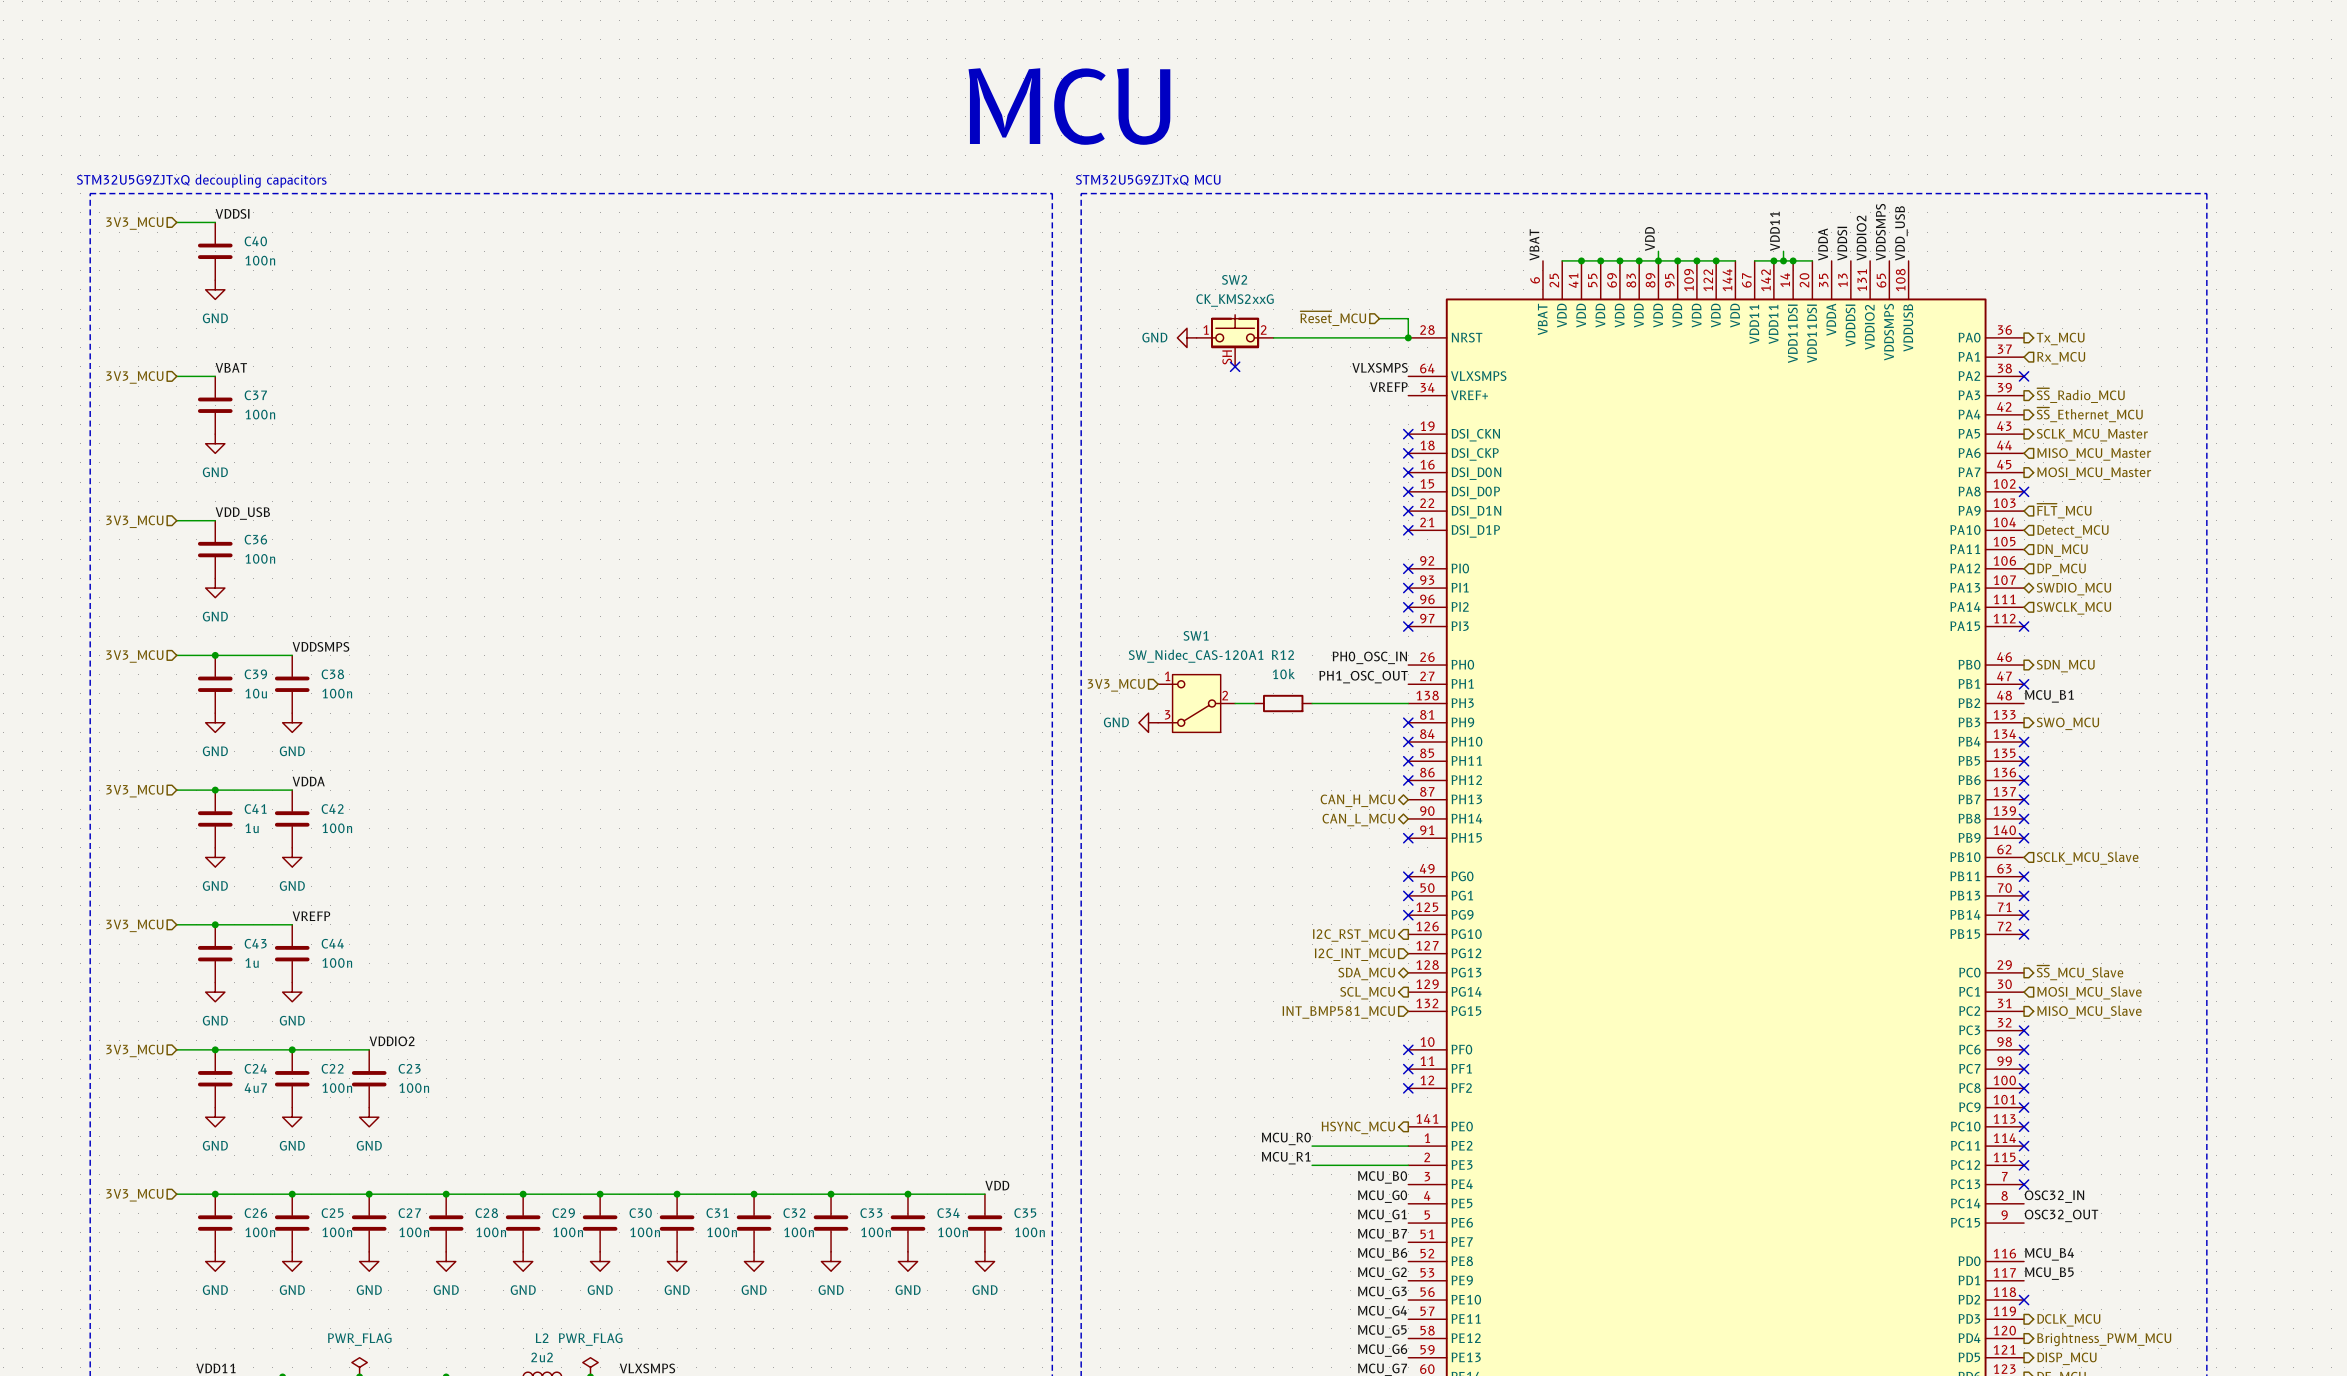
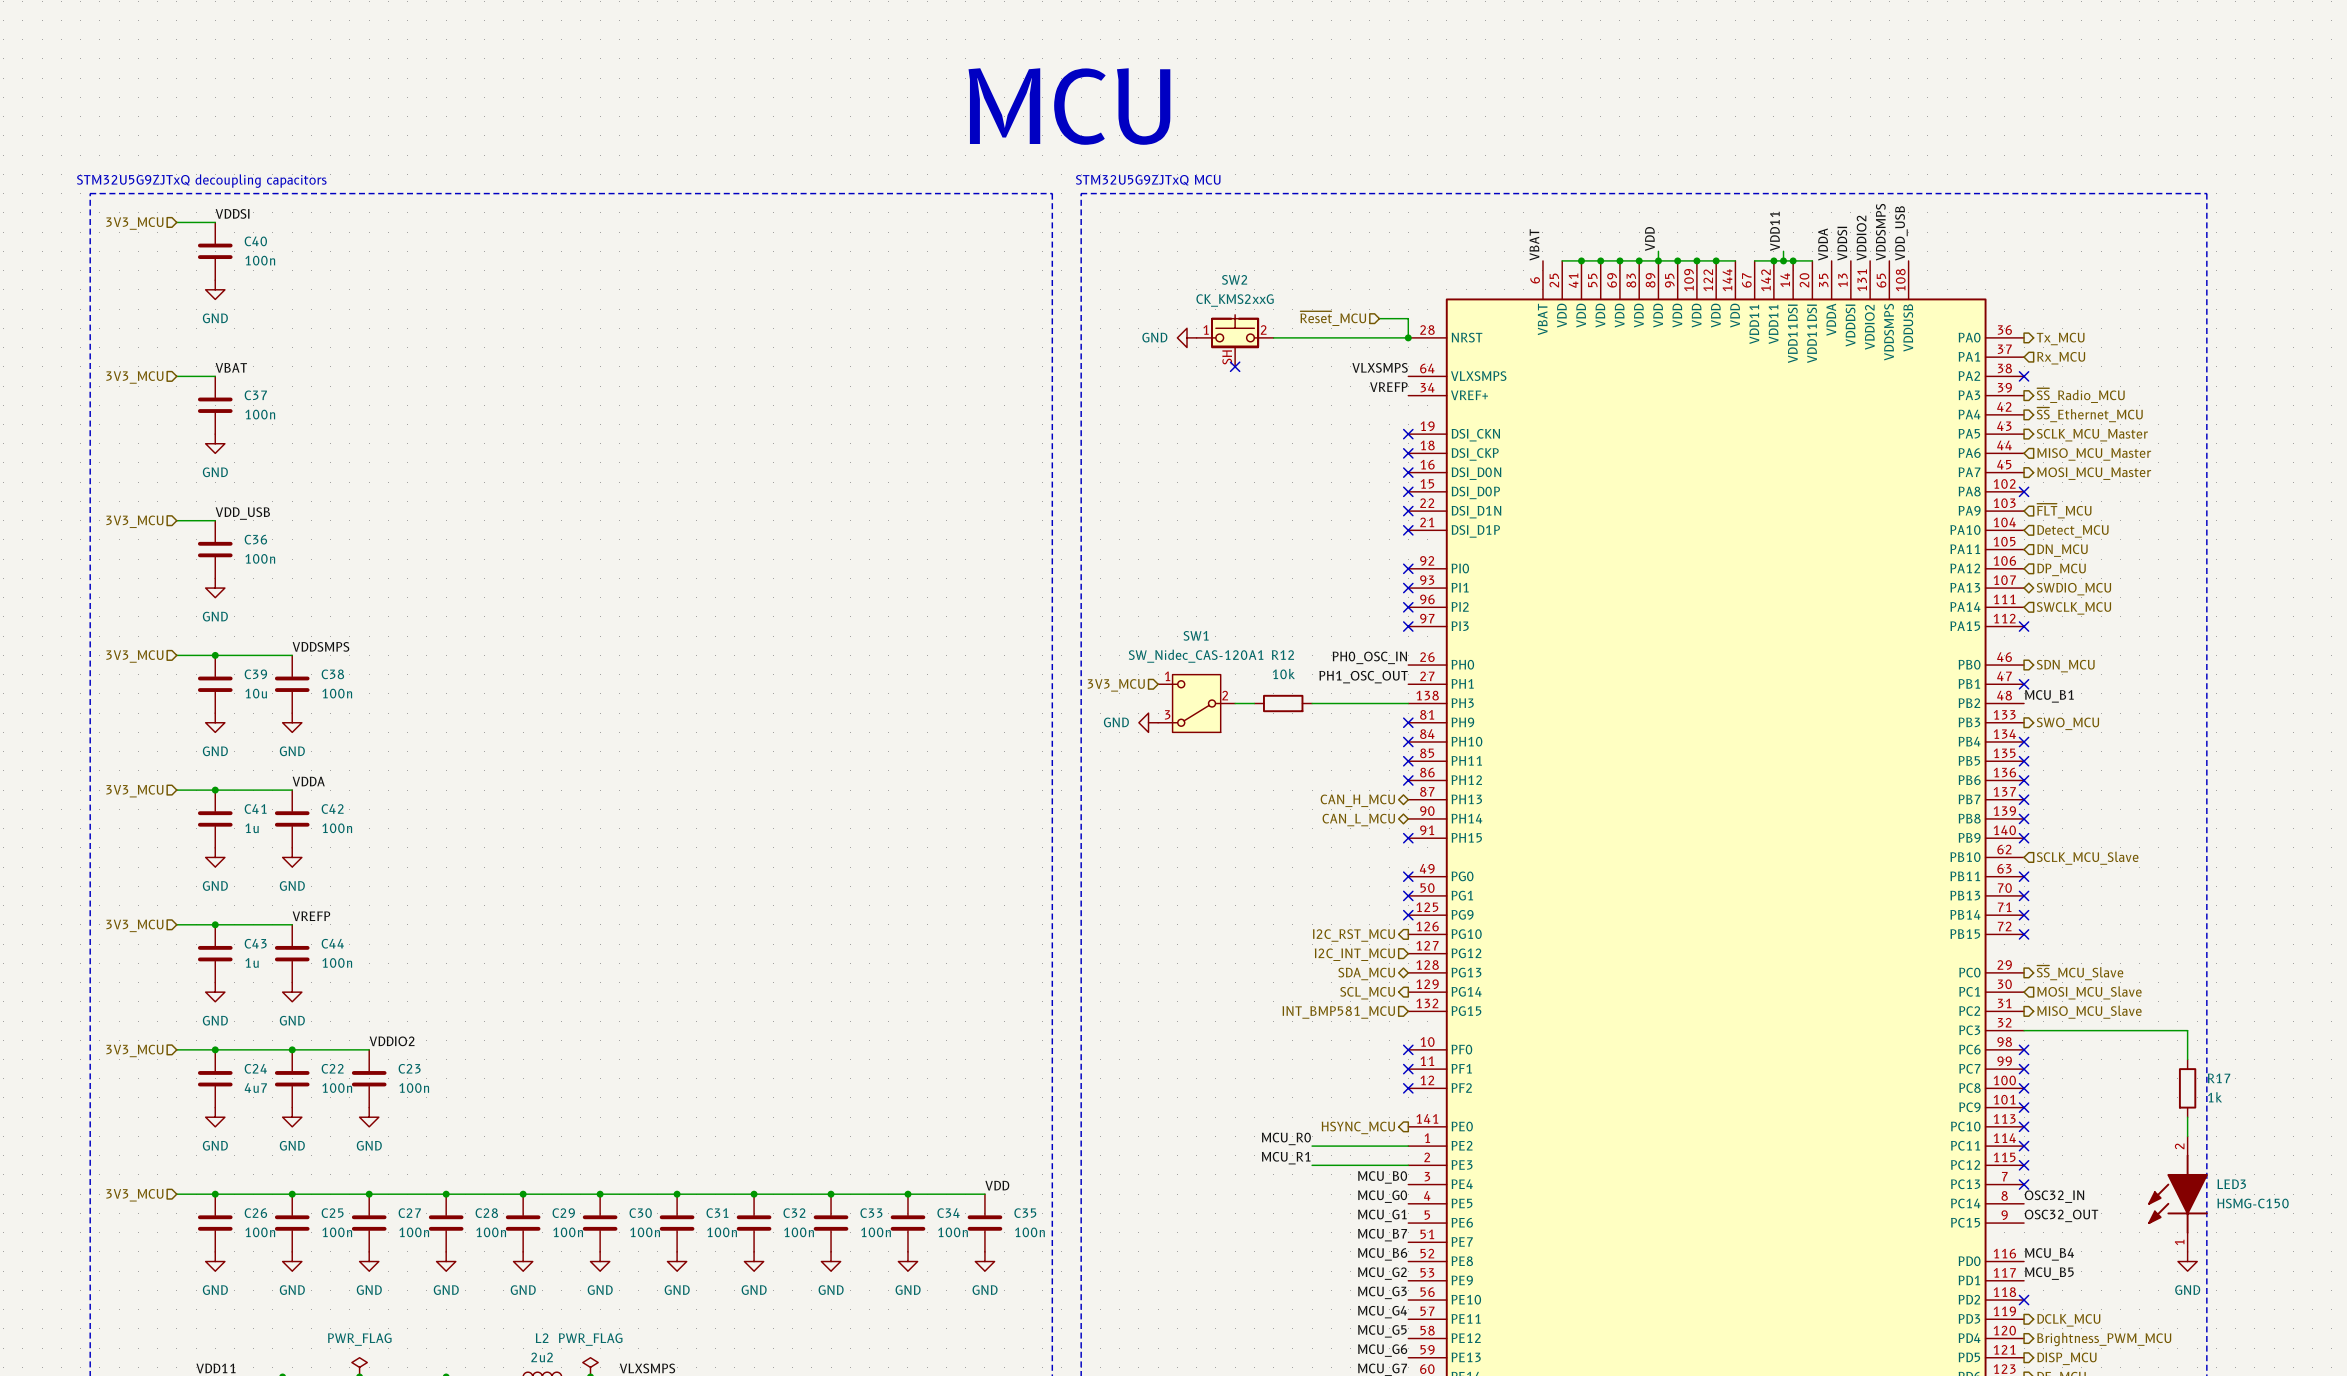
wire: none -> (2024, 1030) (2187, 1030) (2187, 1059)
no-connect mark: (2024, 1030) -> none
R17: none -> 1k (2187, 1088)
wire: none -> (2187, 1117) (2187, 1136)
LED3: none -> HSMG-C150 (2177, 1194)
power symbol: none -> GND (2187, 1261)

